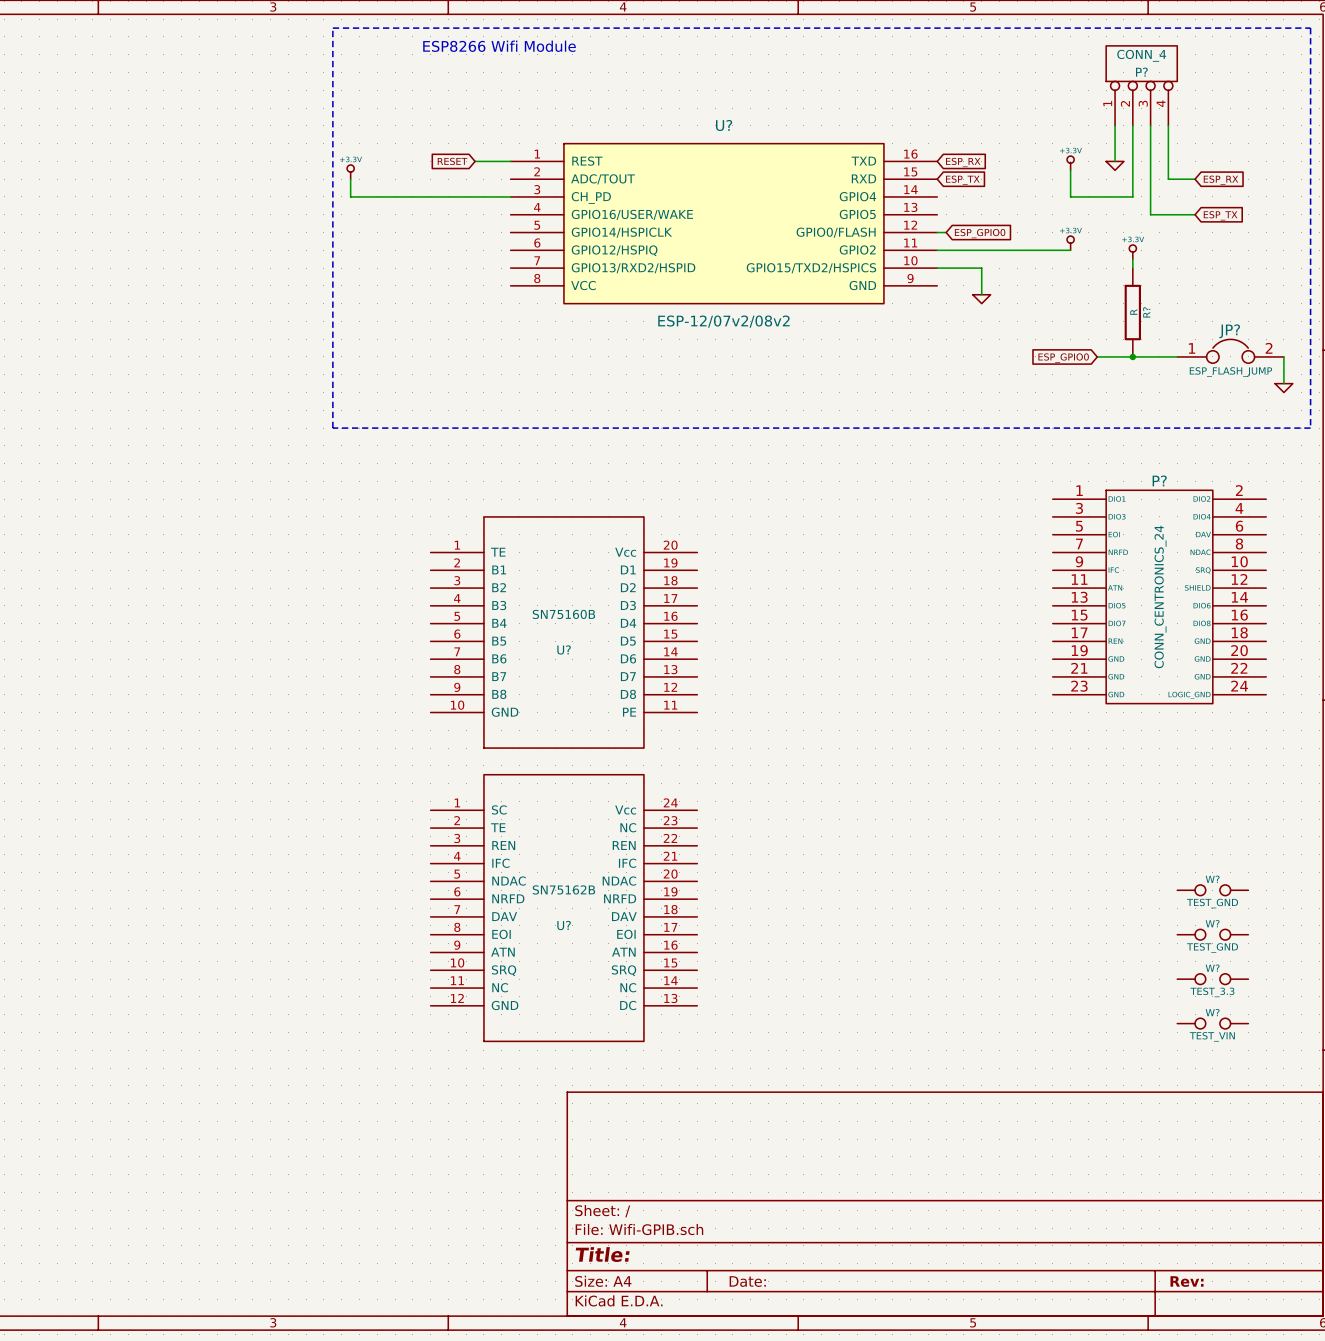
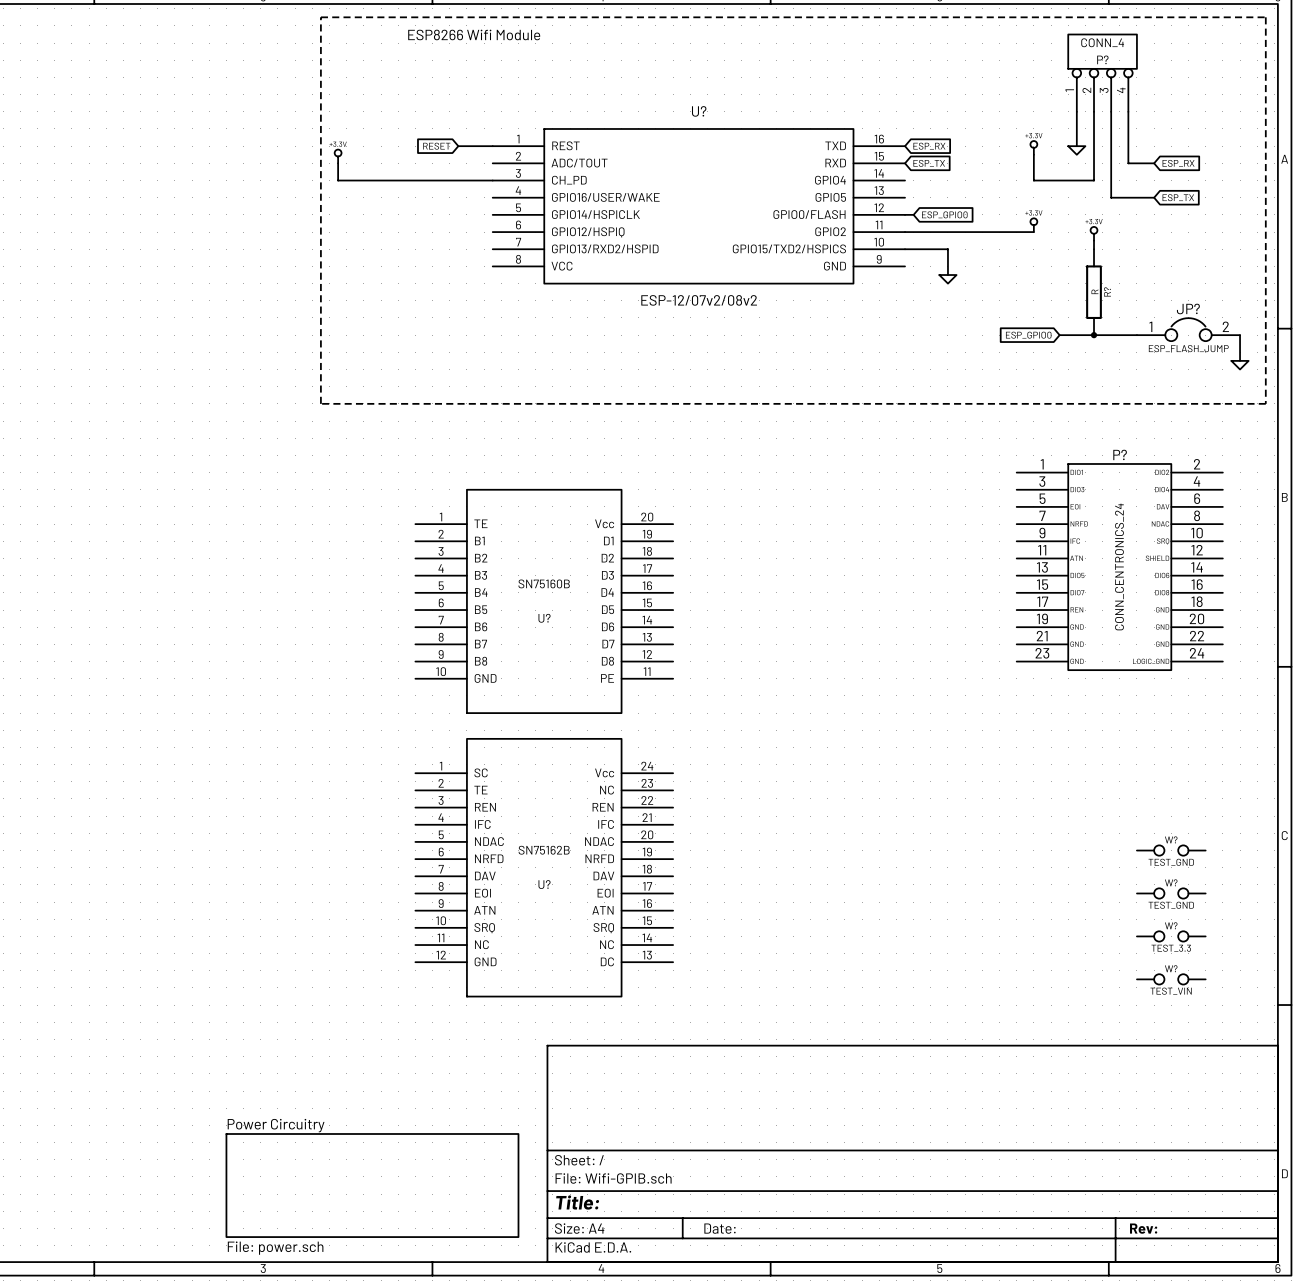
sheet Power Circuitry: none -> File: power.sch (372, 1185)

